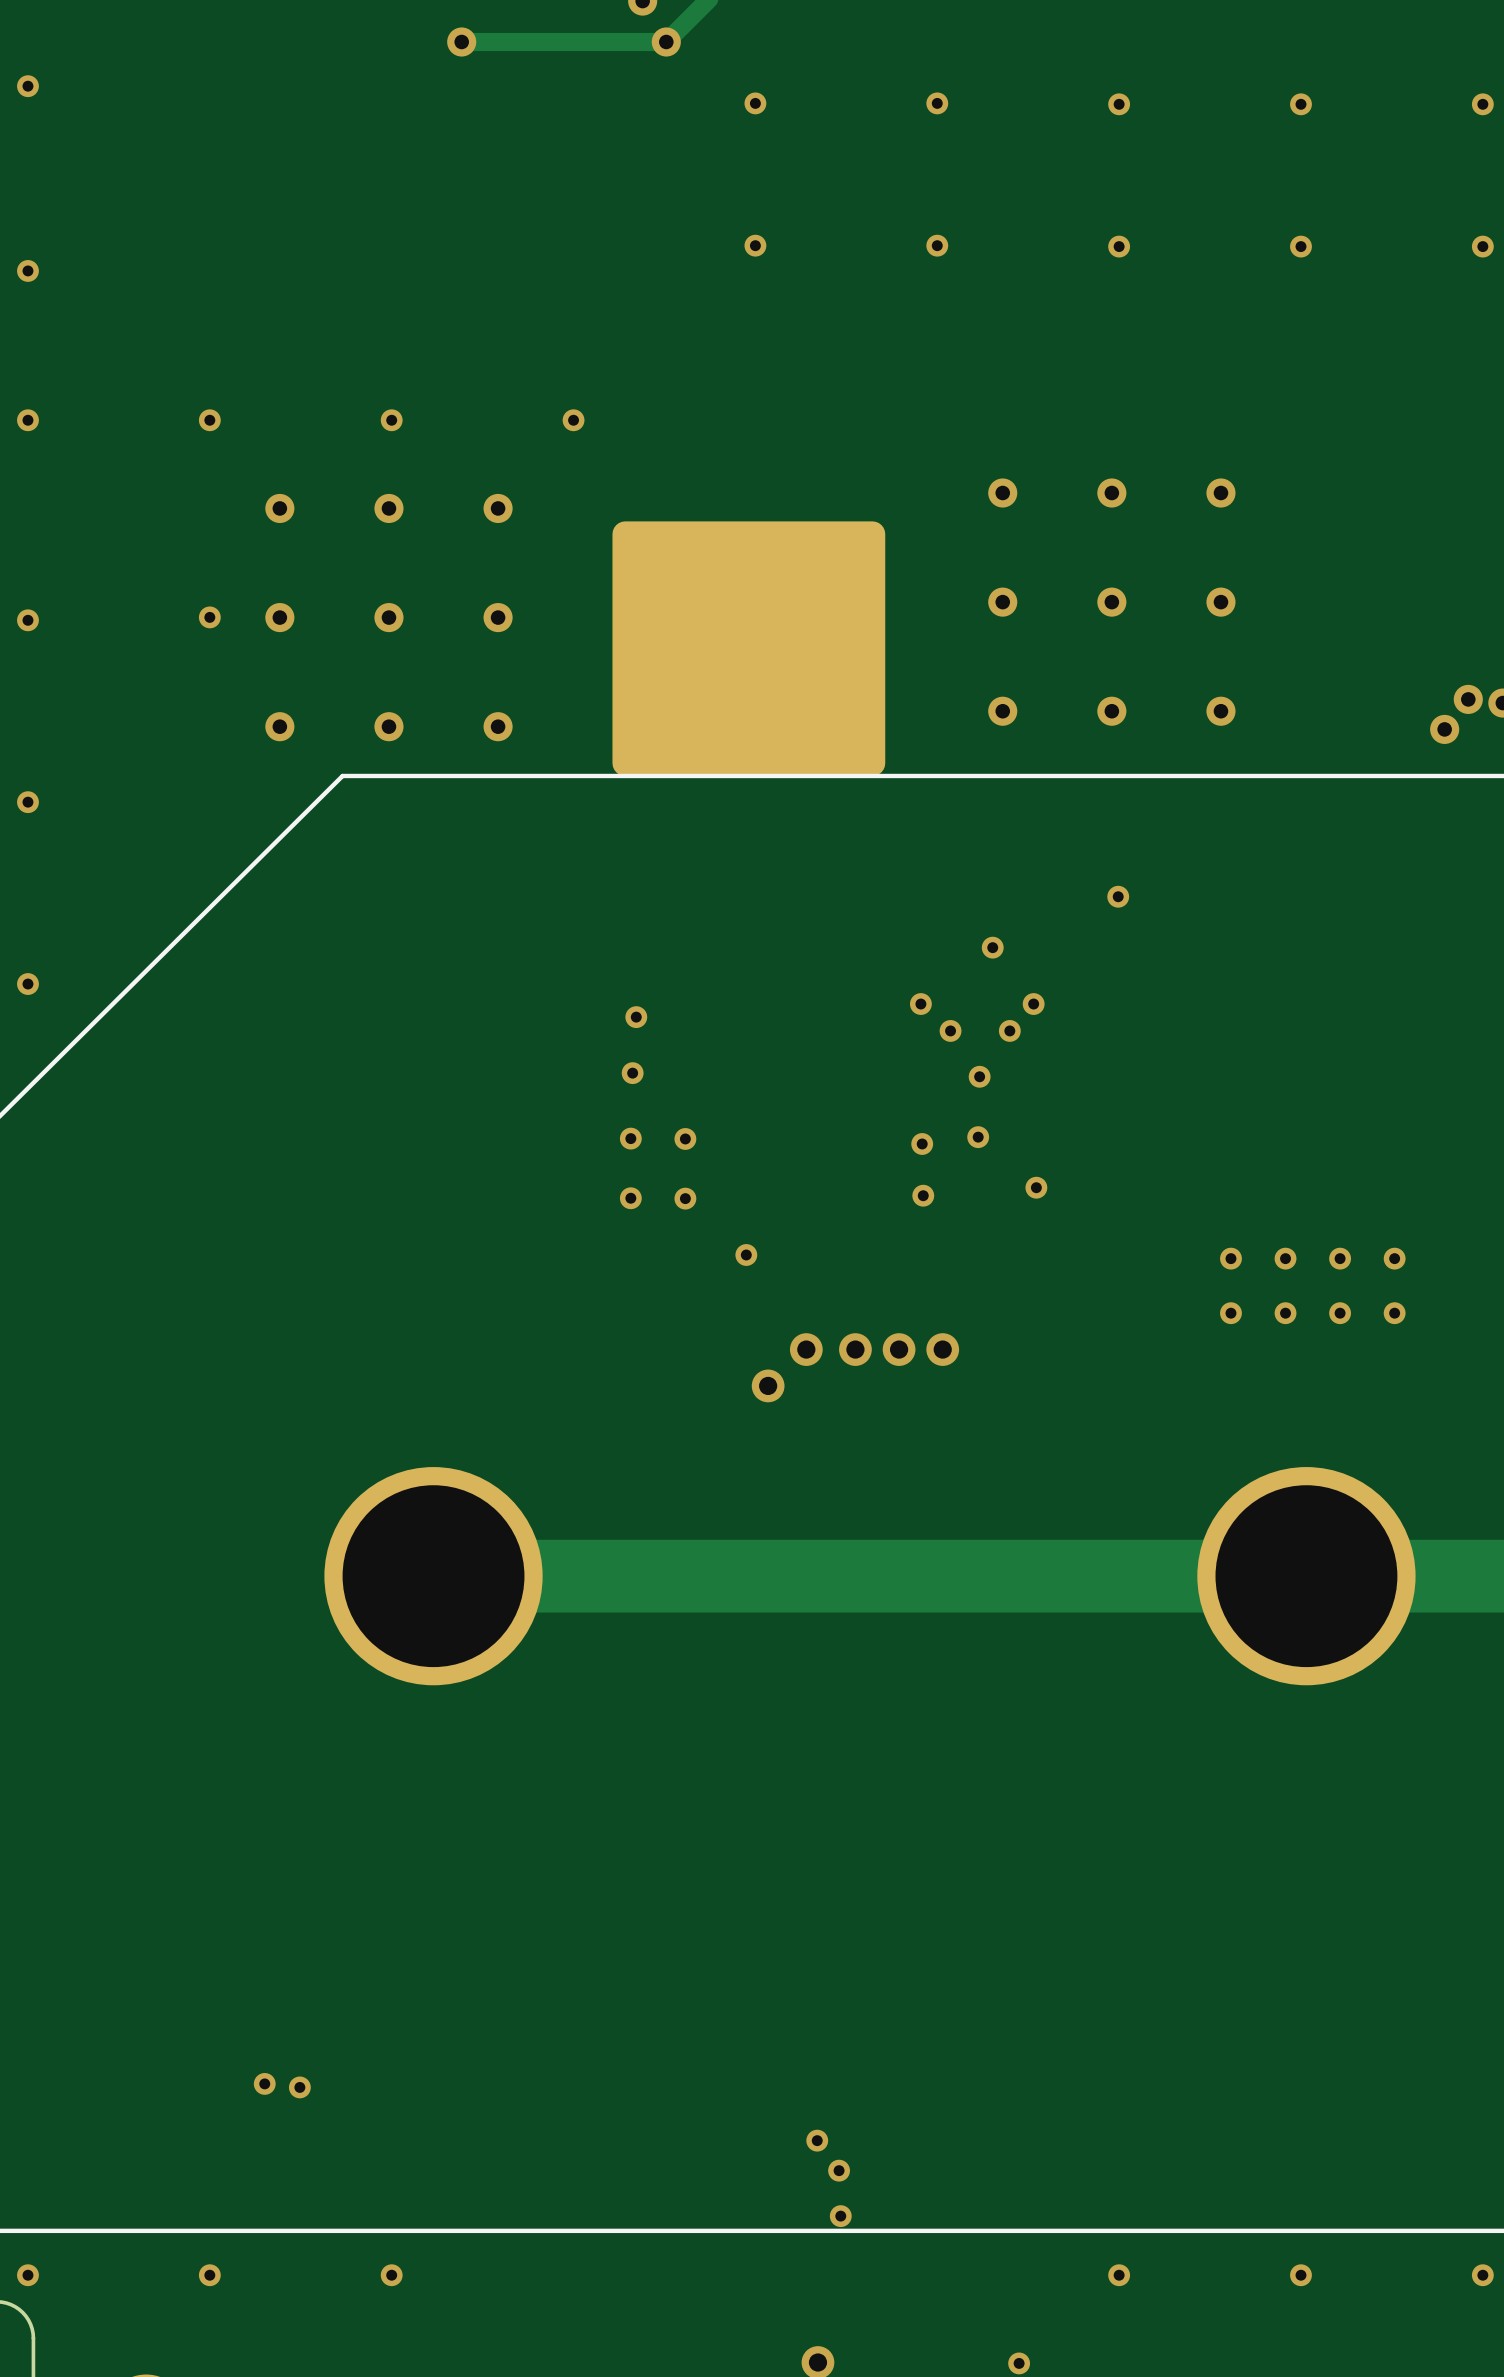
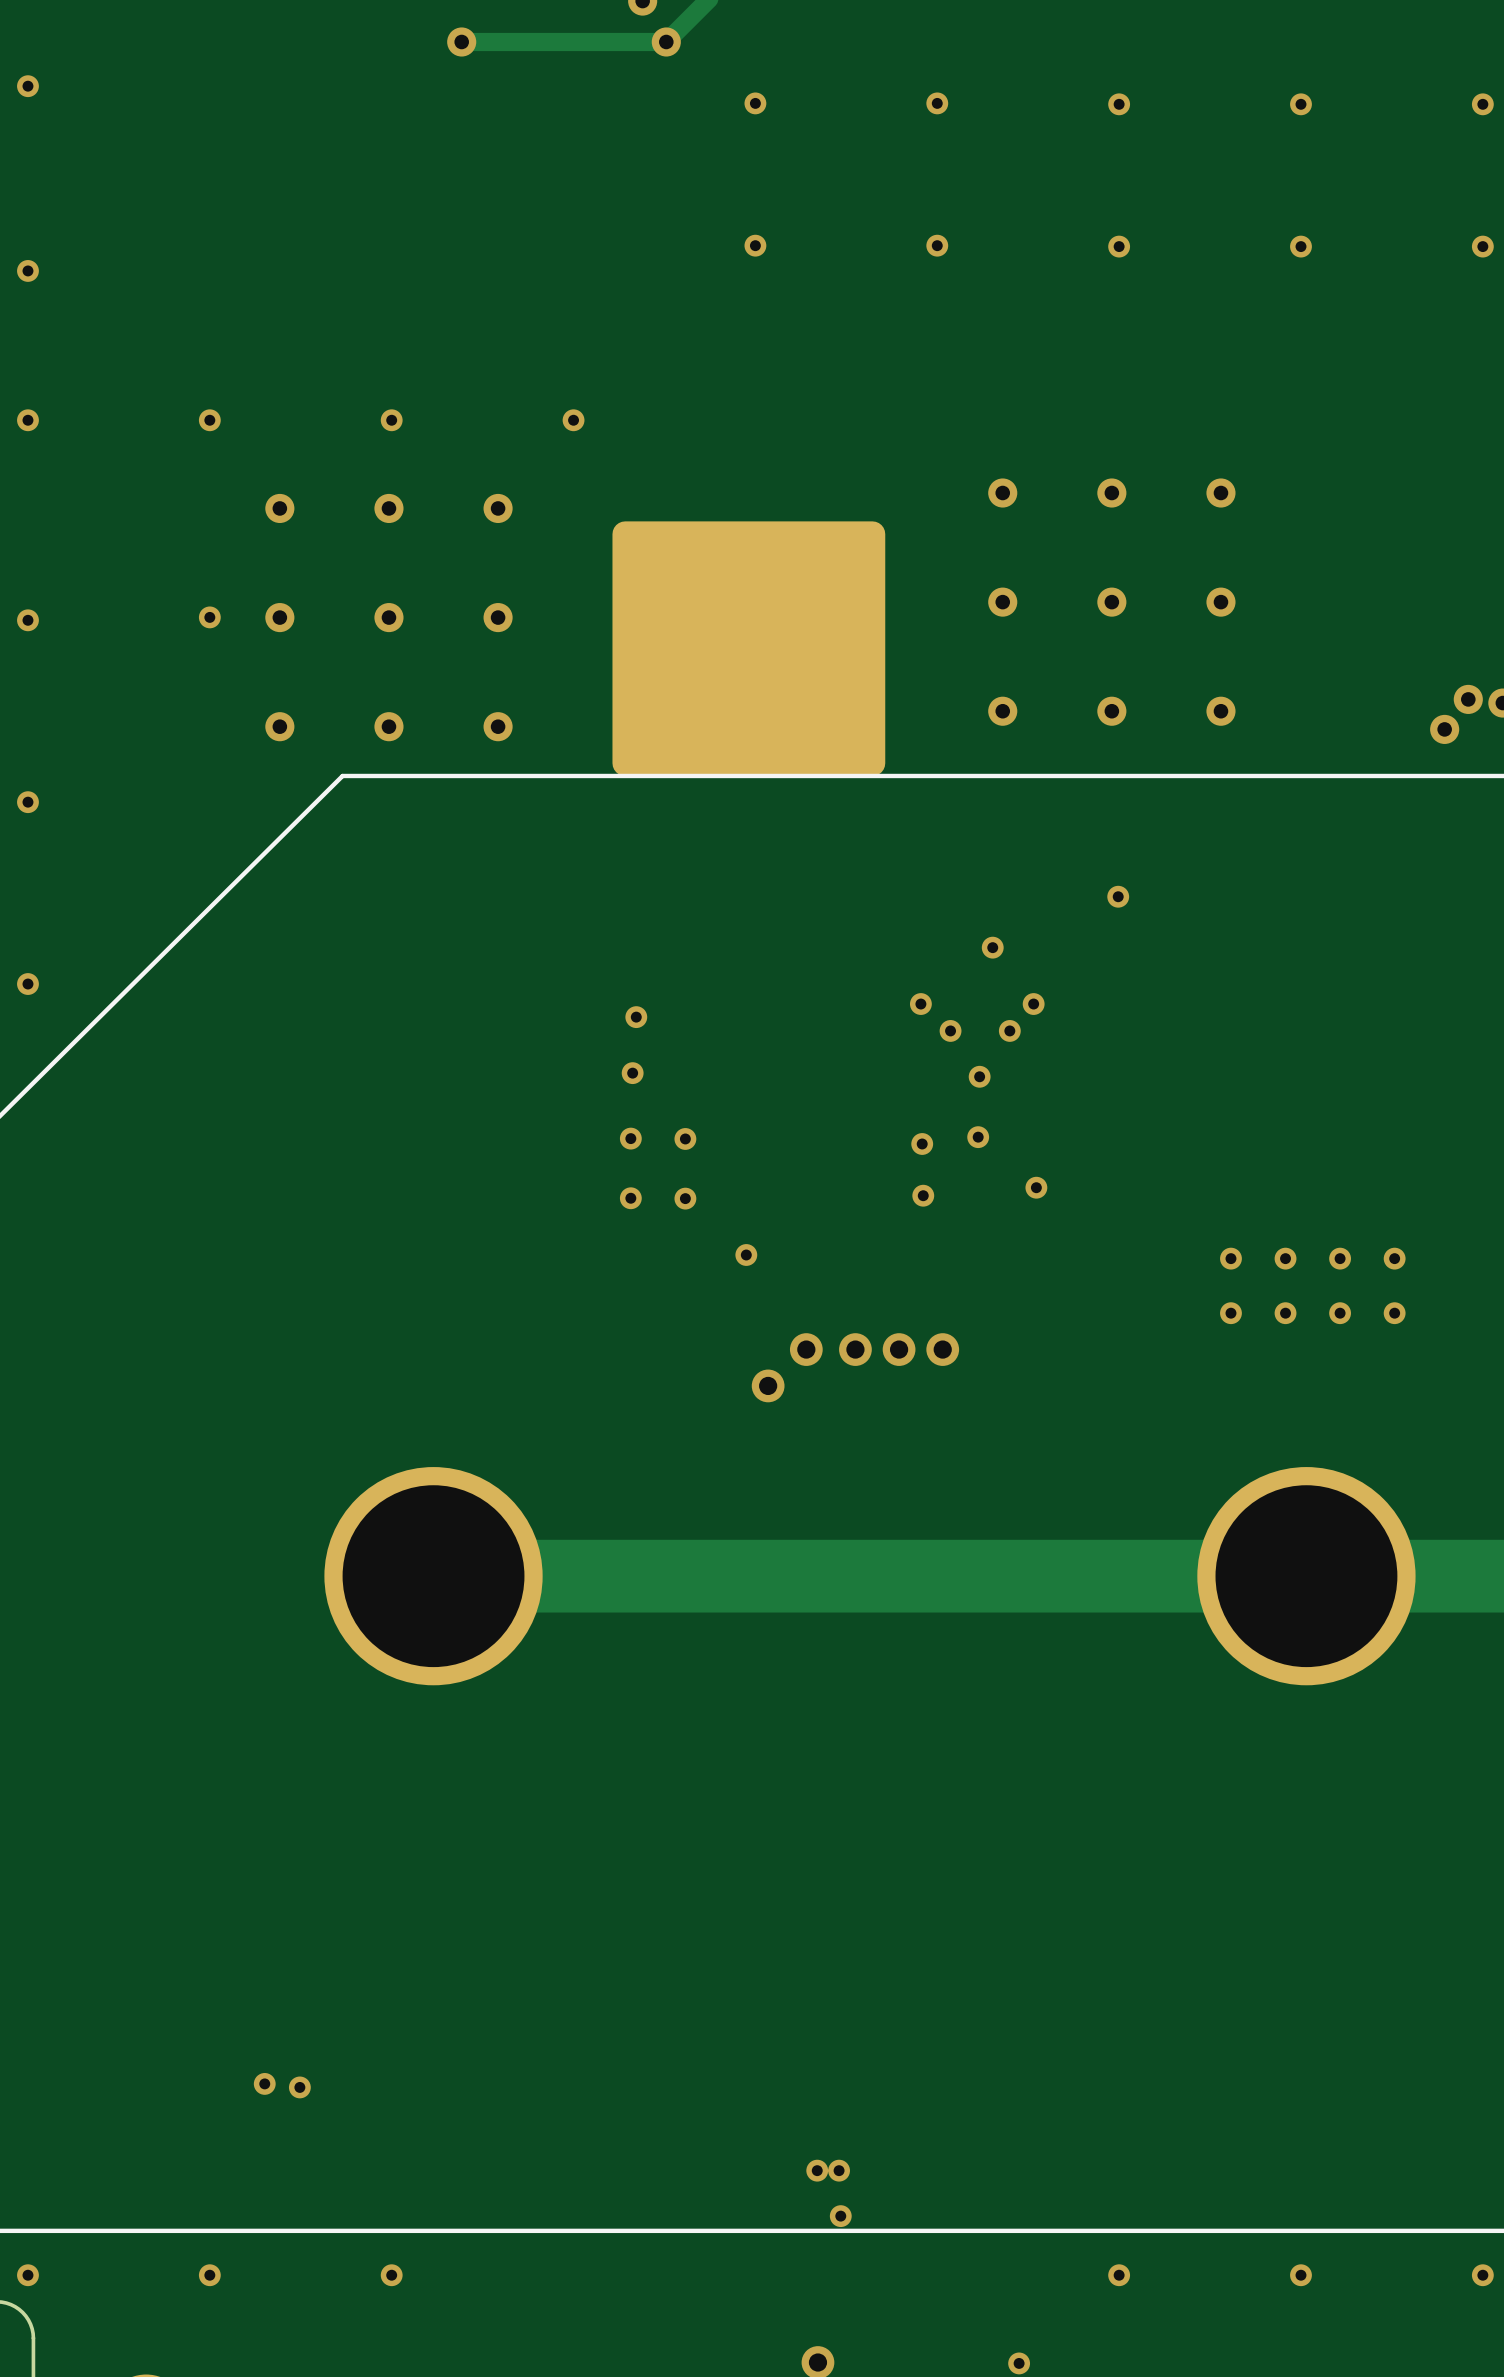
via position: (817, 2140) -> (817, 2170)

